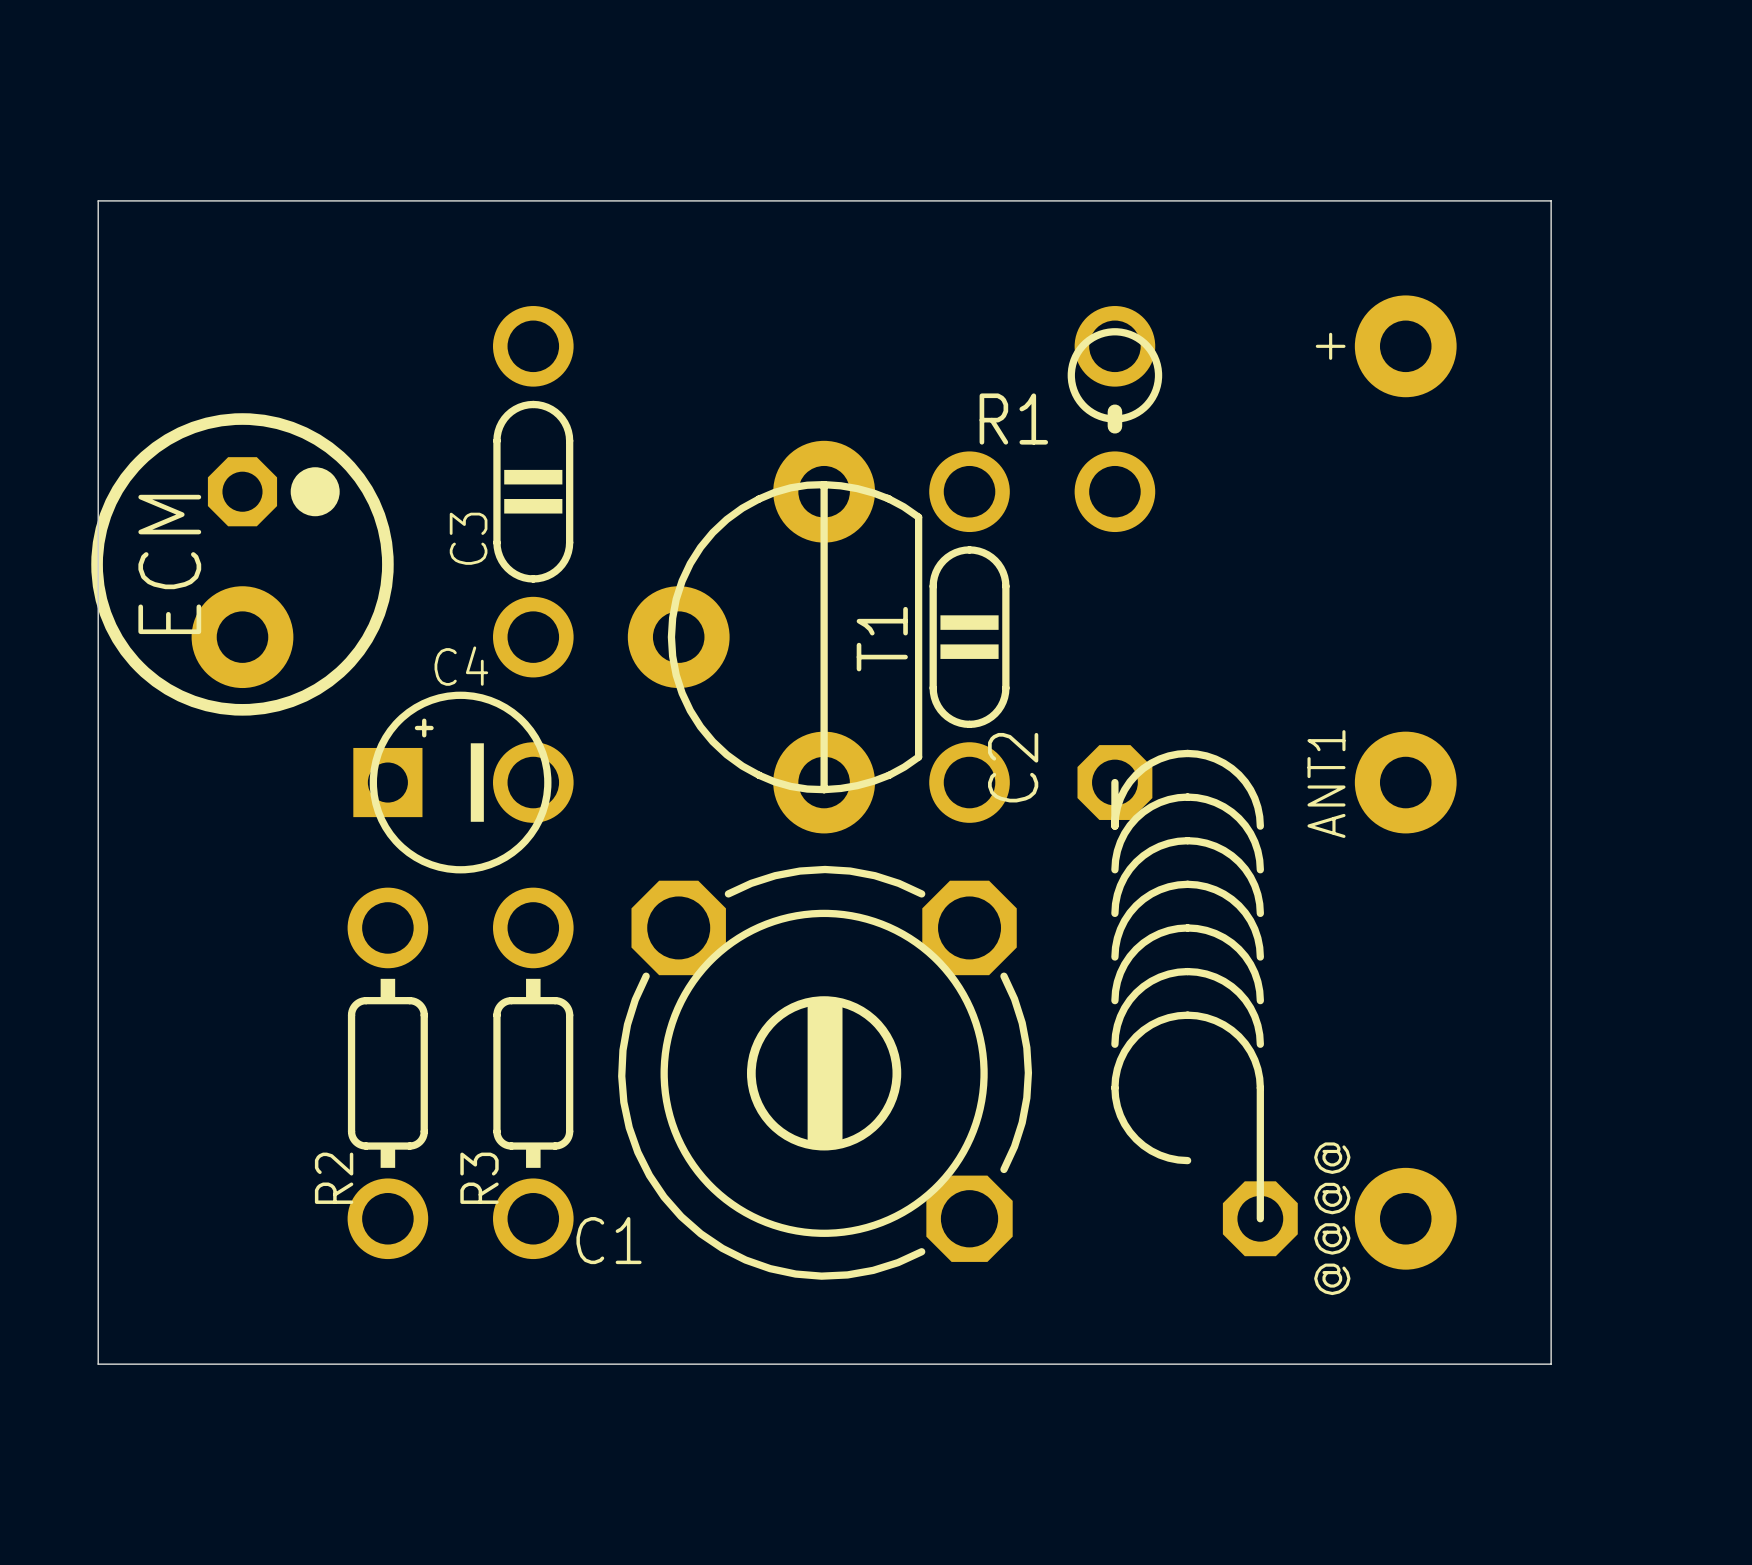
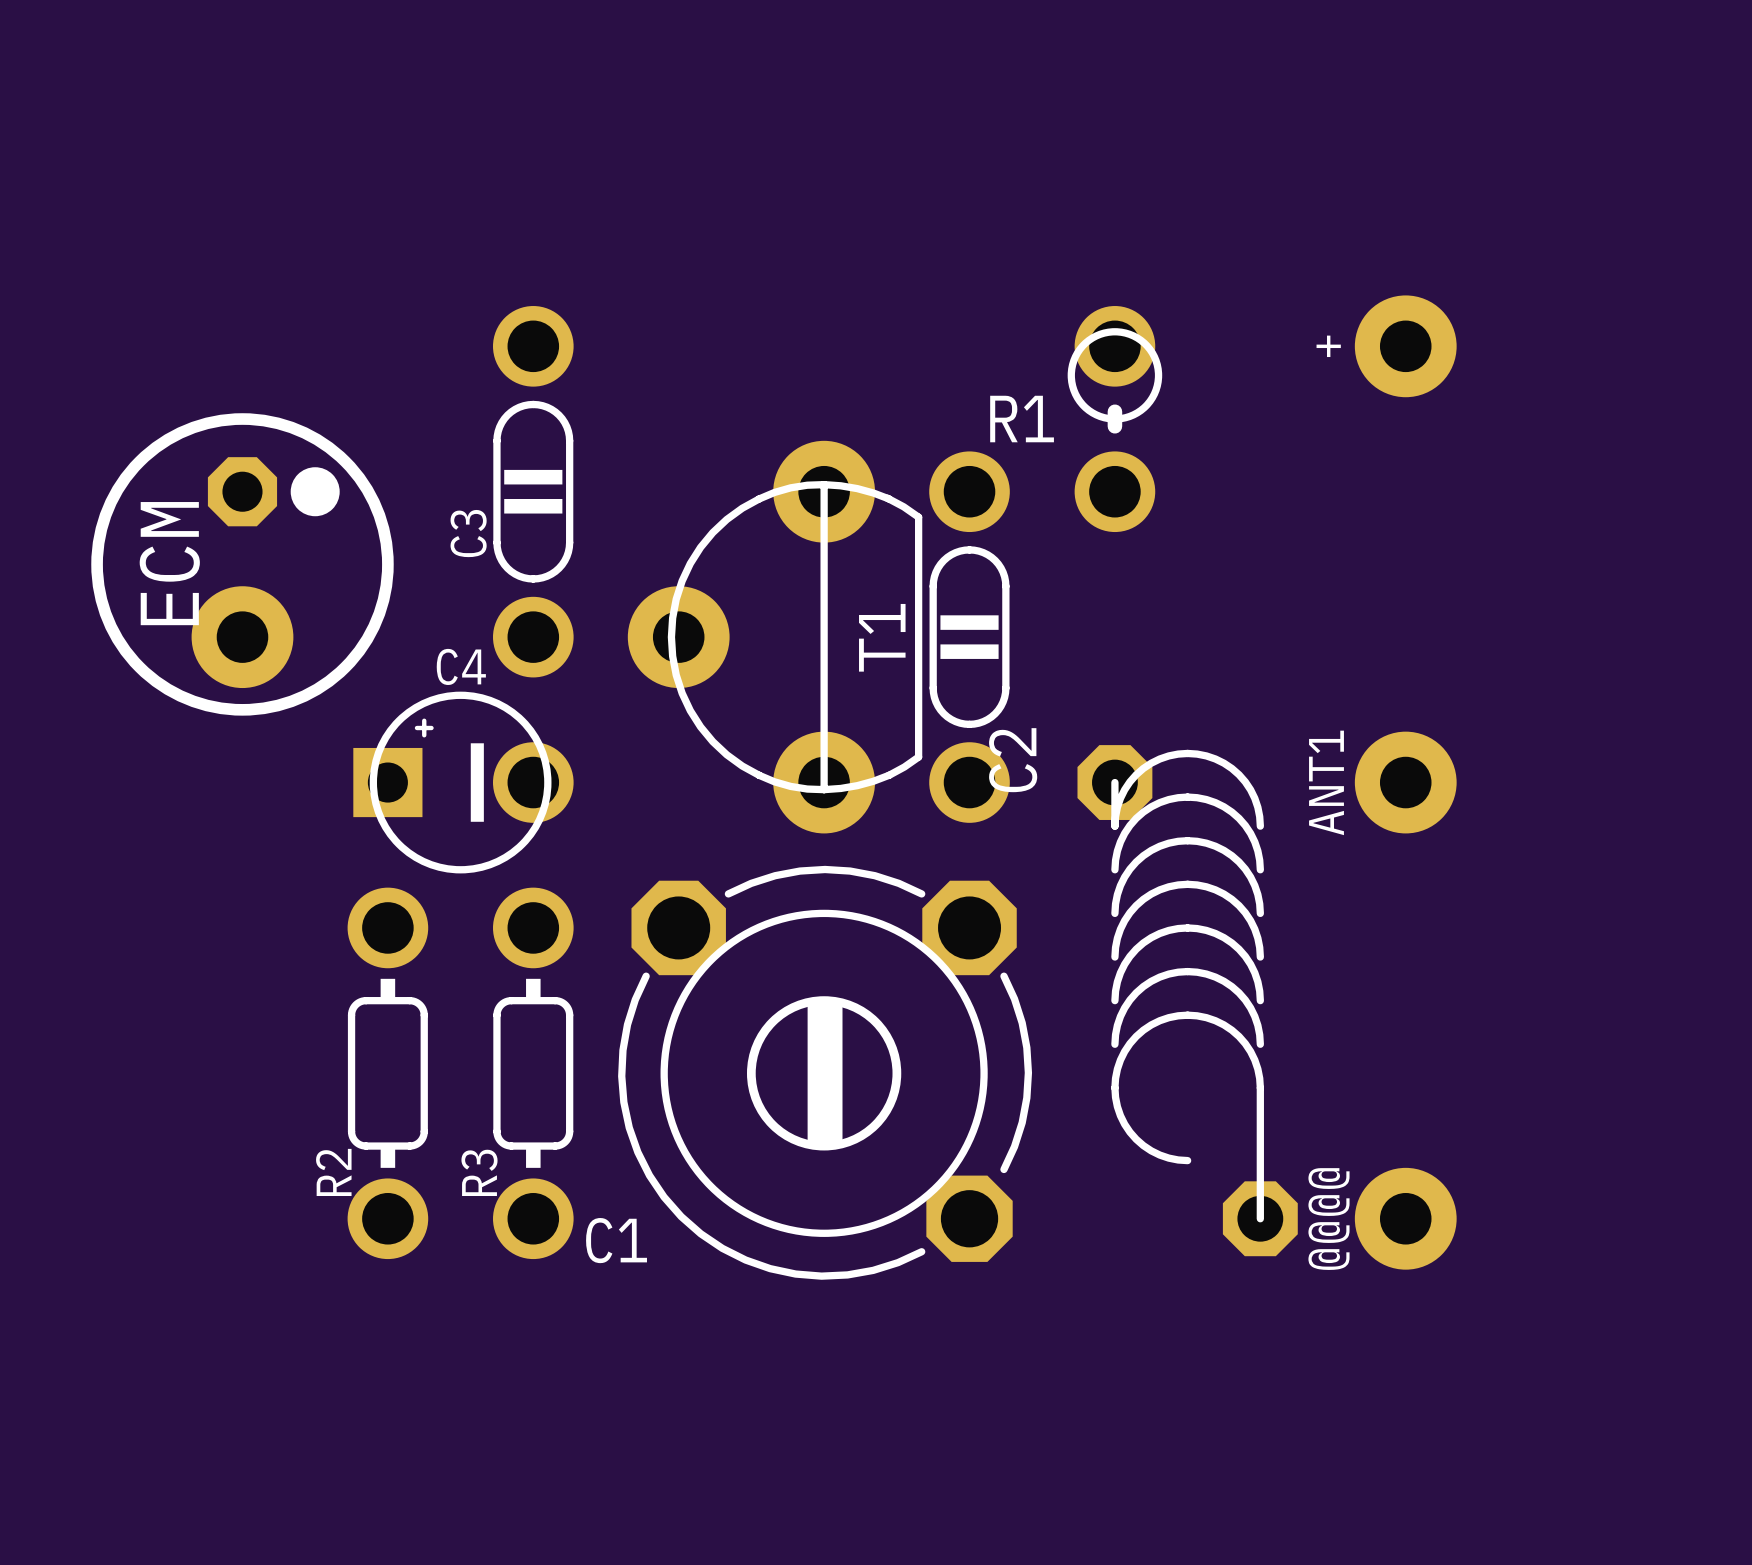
board edge: (98, 200) (1551, 200) (1551, 1364) (98, 1364) (98, 200) -> none

